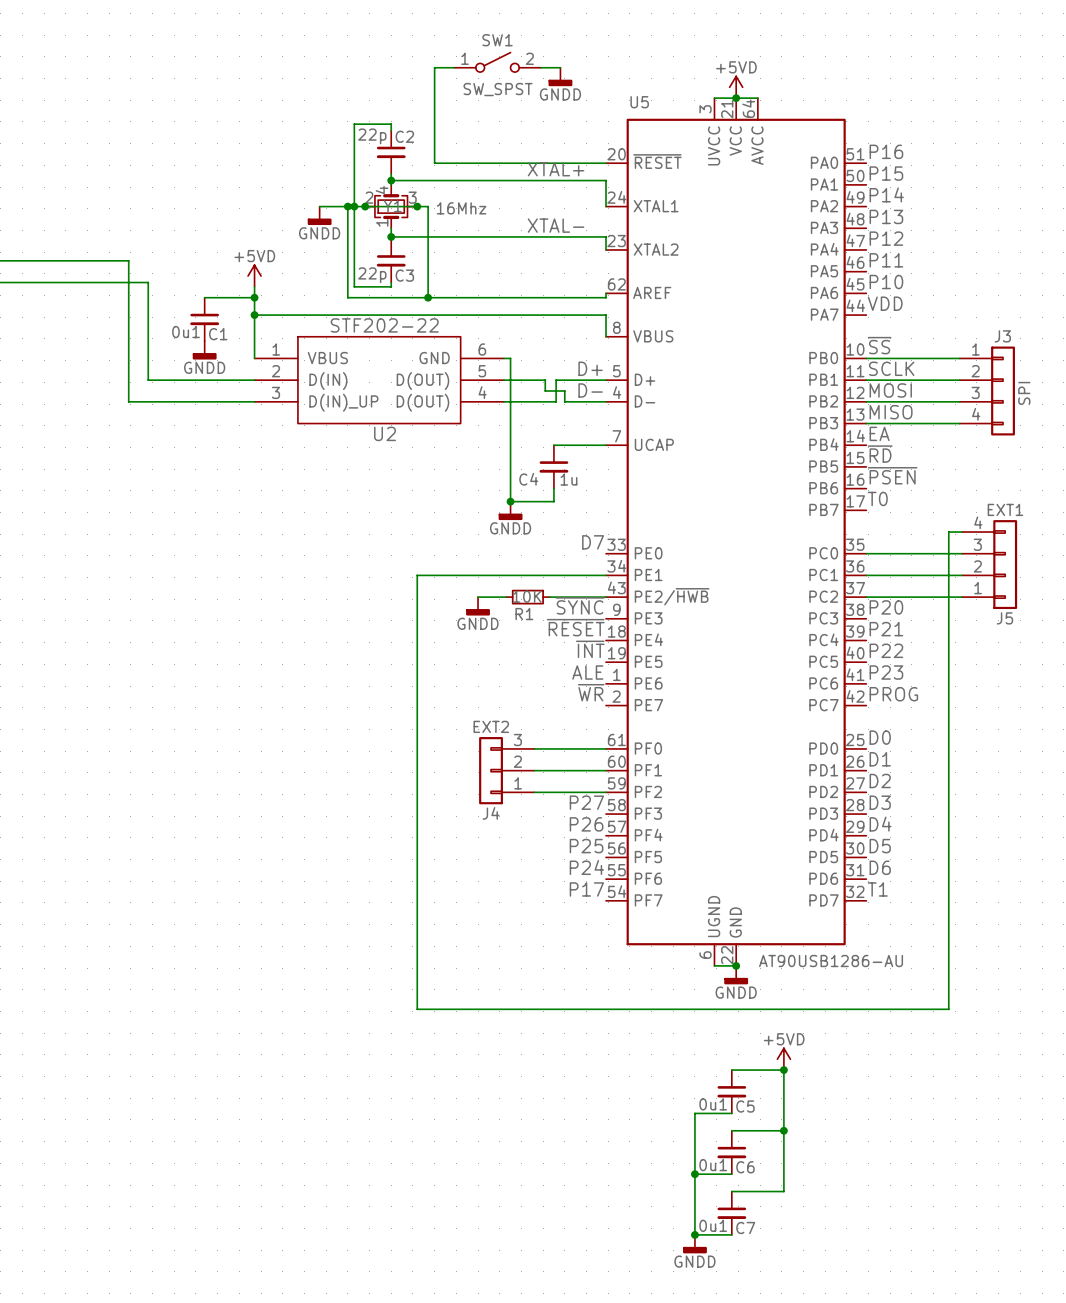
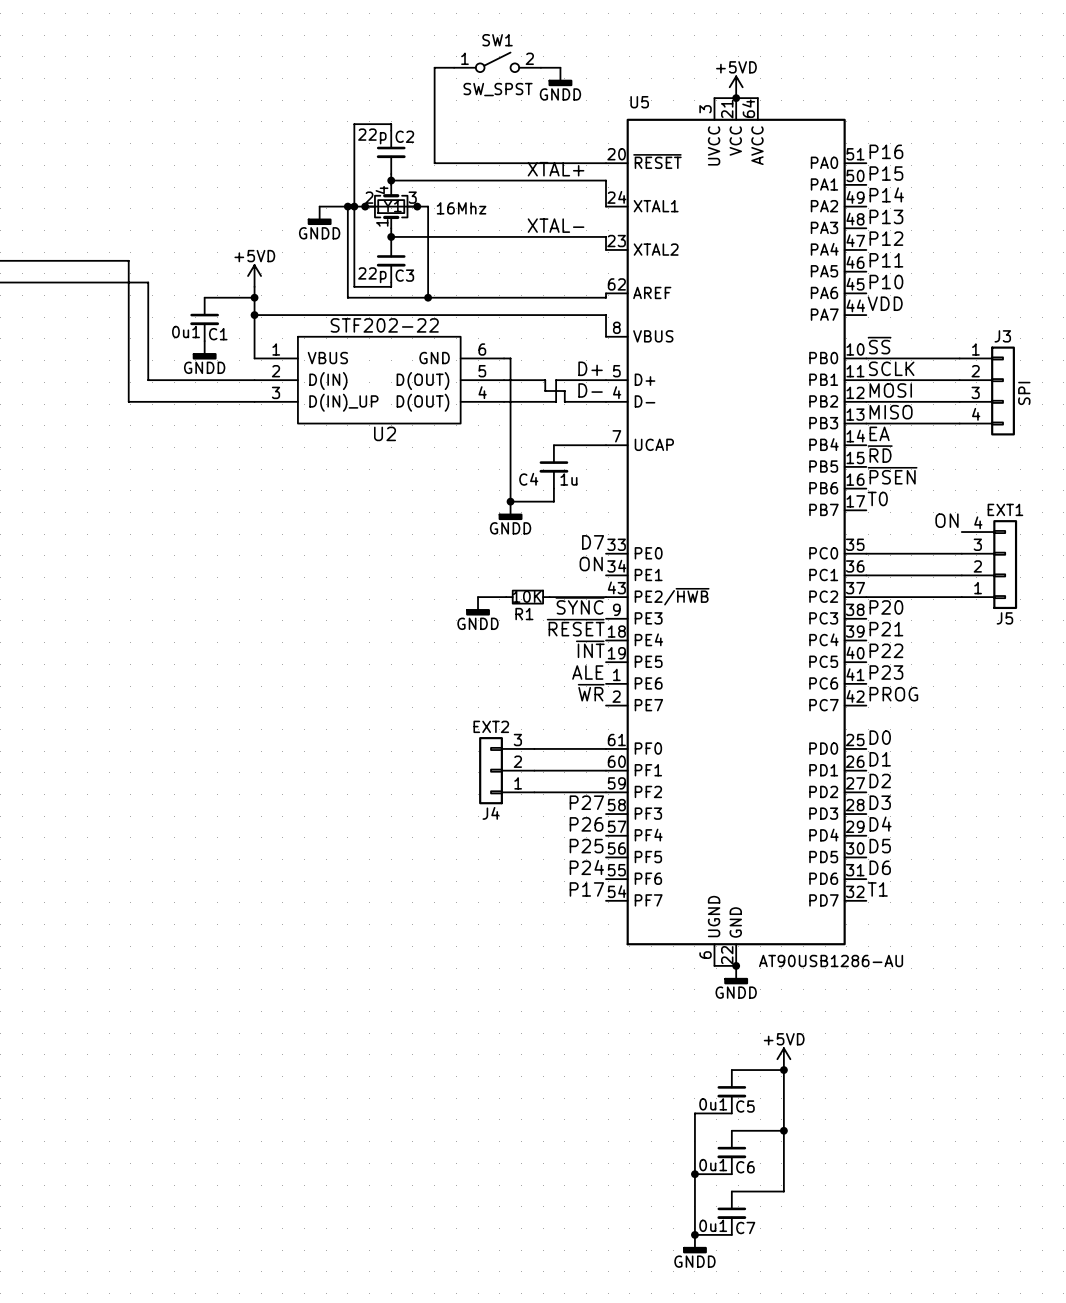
label: none -> ON (947, 520)
wire: (961, 532) (948, 532) (948, 1009) (417, 1009) (417, 575) (606, 575) -> none
label: none -> ON (591, 564)

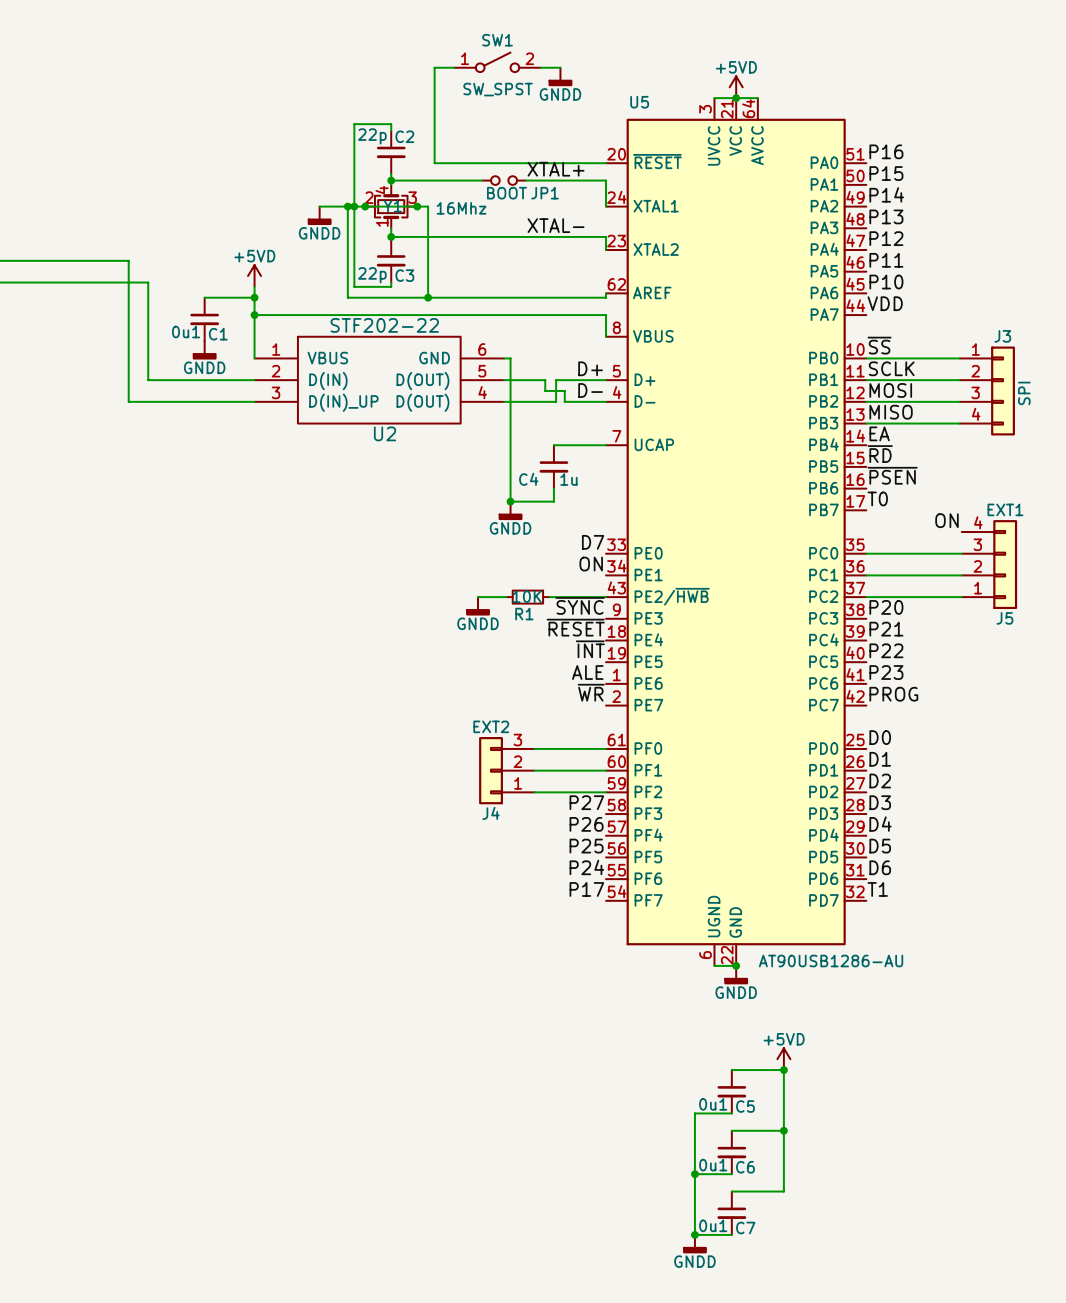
JP1: none -> BOOT (504, 180)

